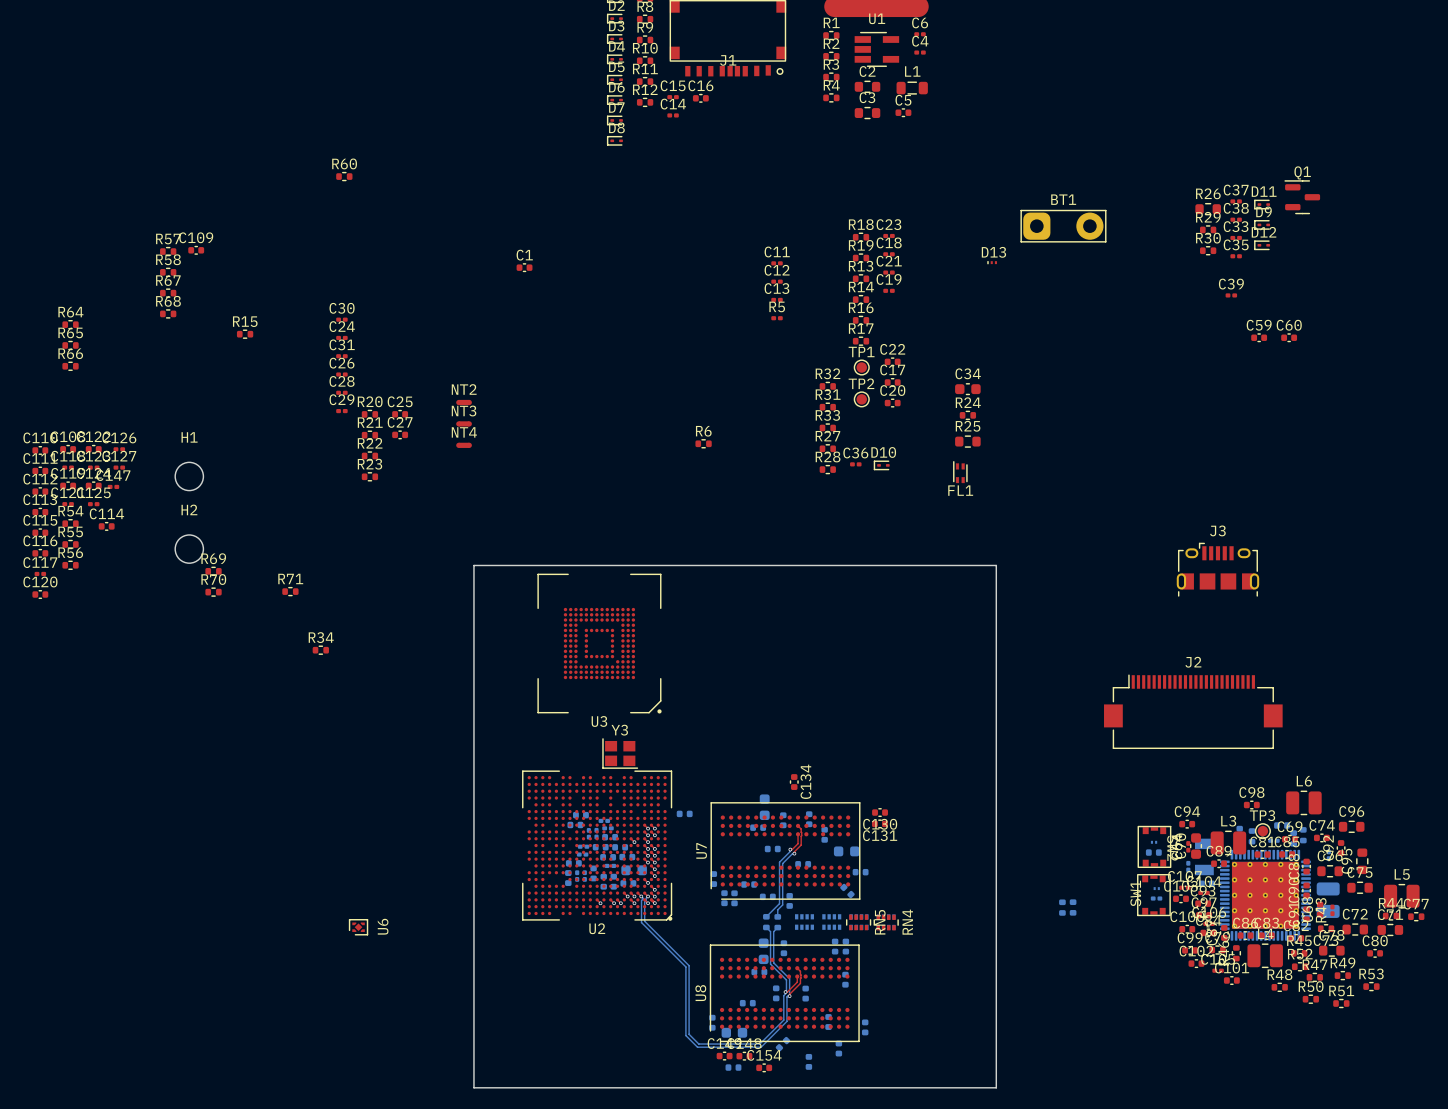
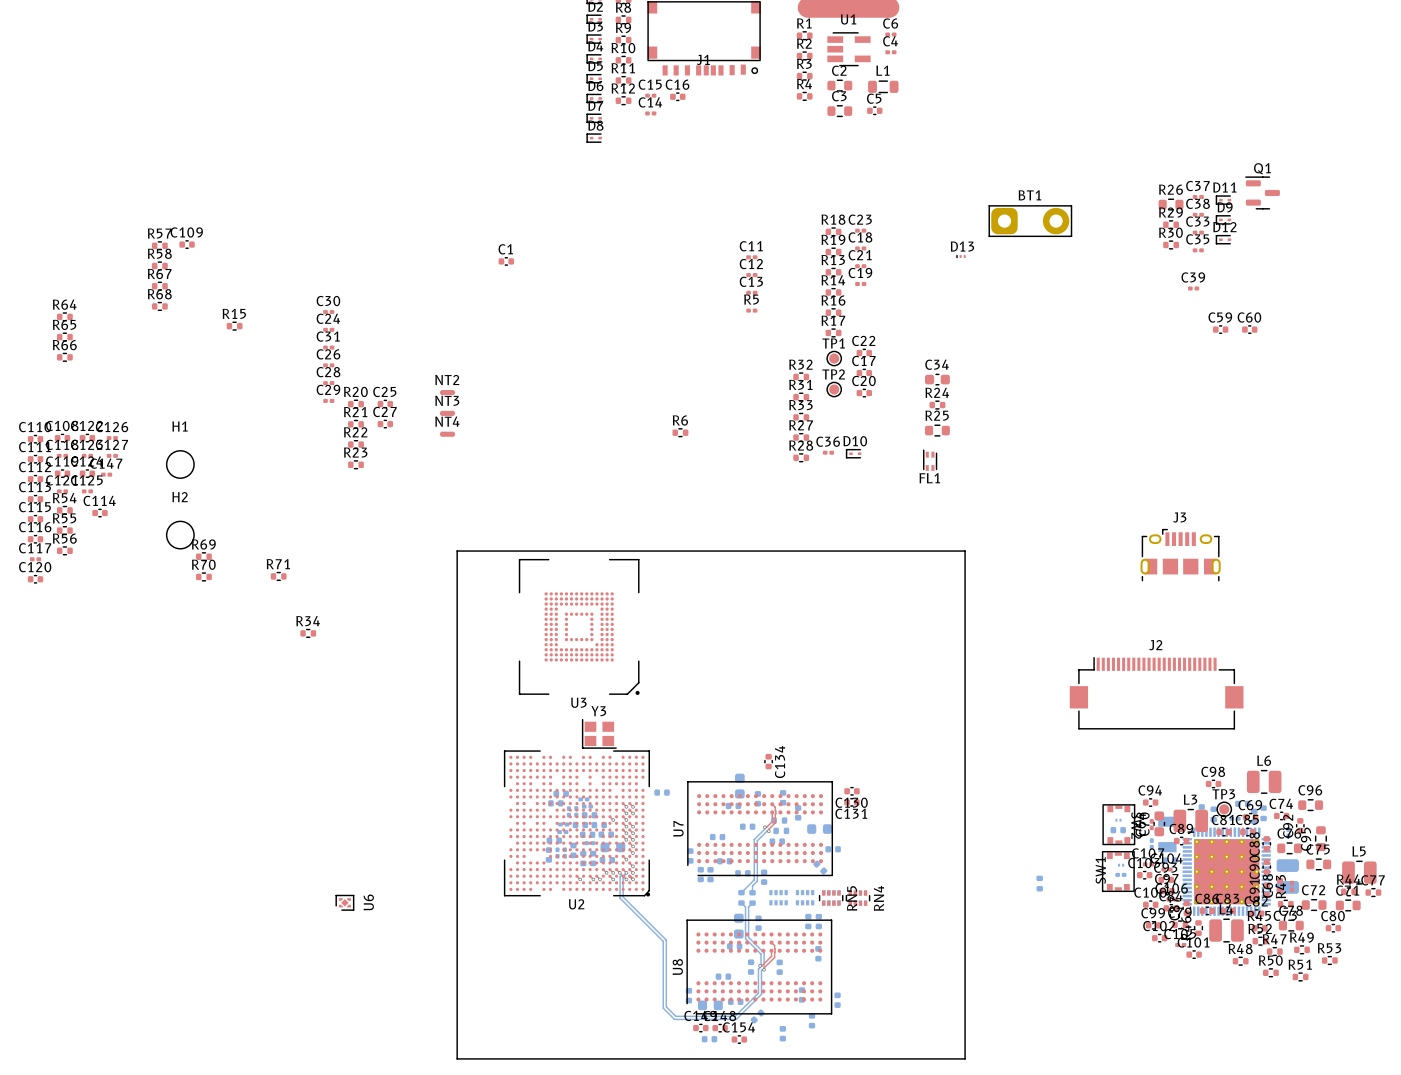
R60: (344, 176) -> none
part: none -> (779, 820)
part: none -> (781, 830)
part: none -> (717, 837)
part: (1062, 907) -> none
part: none -> (735, 1001)

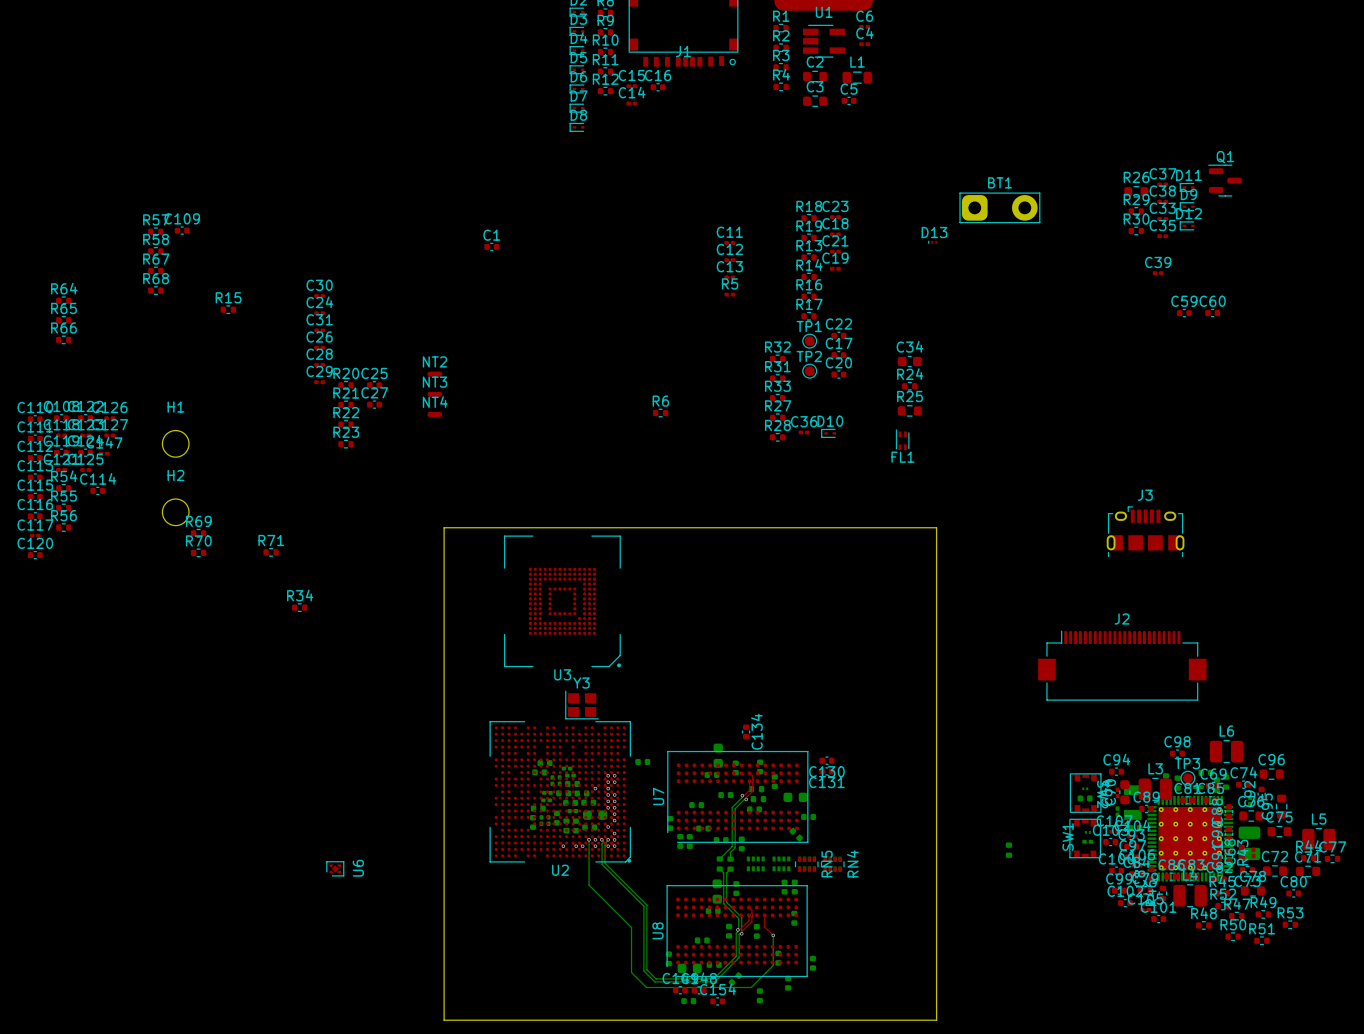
bottom track: none -> (589, 839) (589, 885) (631, 927) (631, 972) (646, 987) (751, 987) (773, 965) (773, 935)
top track: none -> (764, 915) (764, 926) (773, 935)
via: none -> (773, 935)

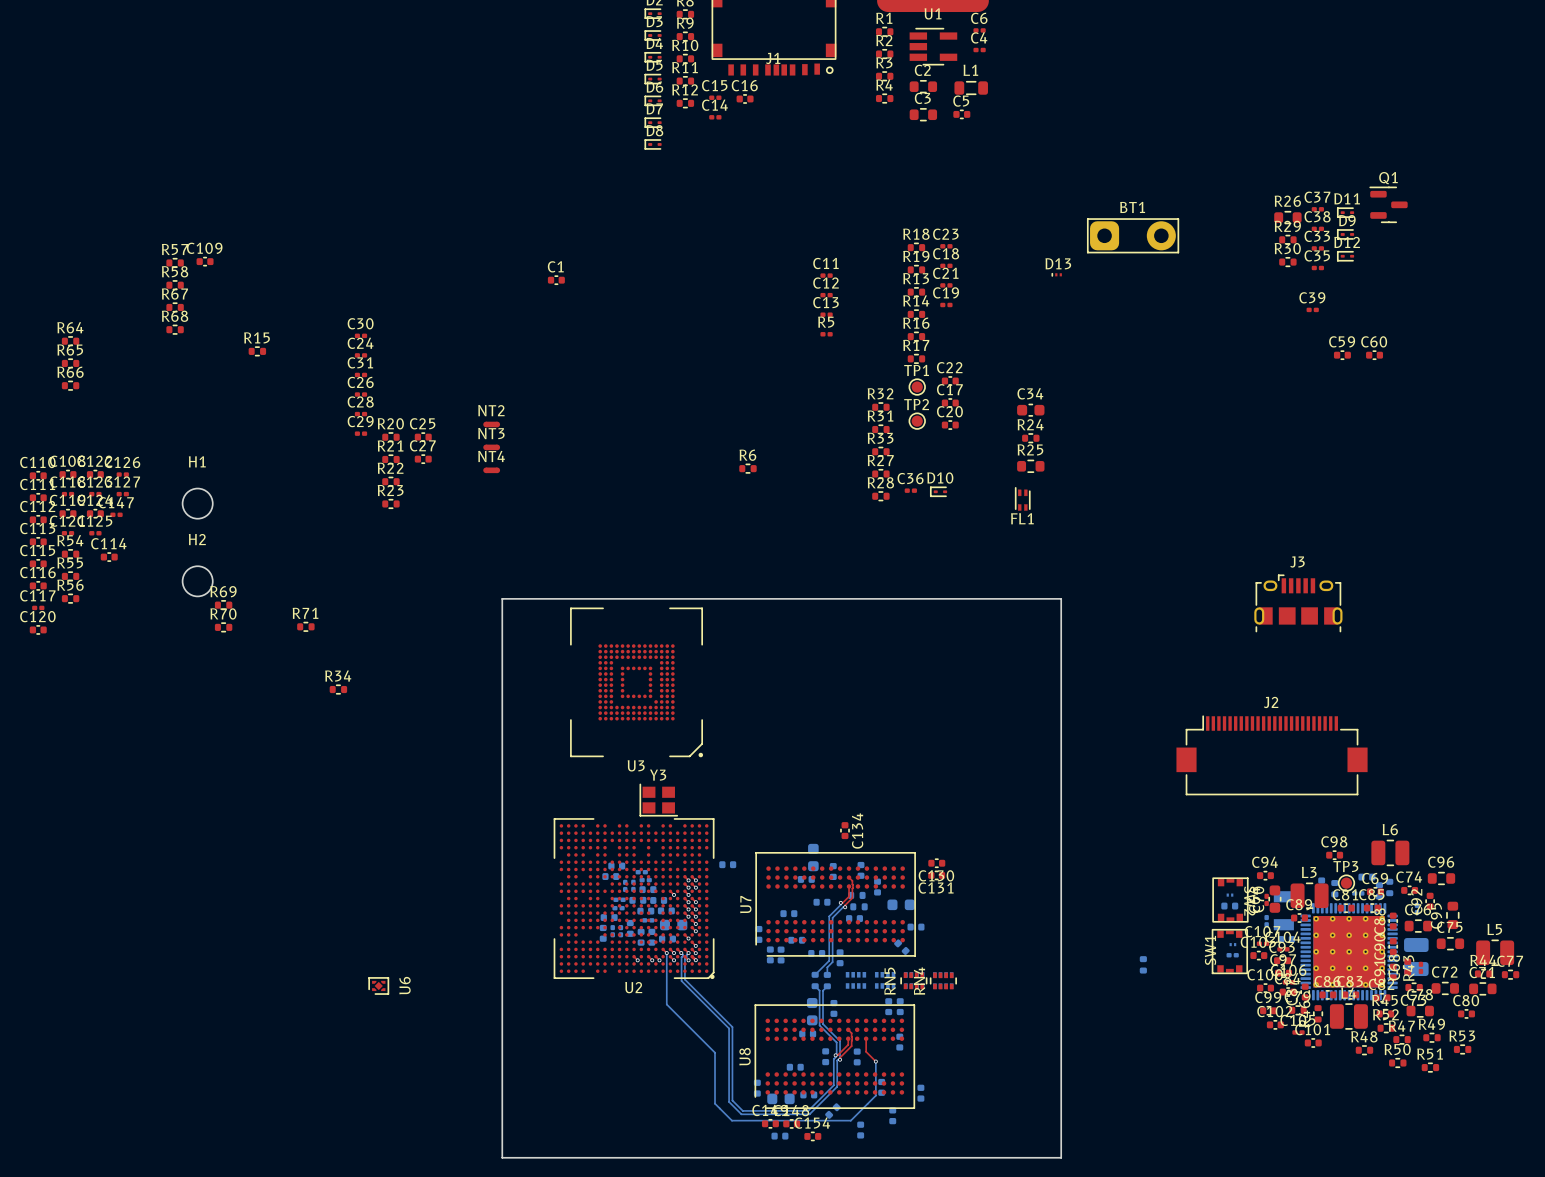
RN4 name position: RN4 (852, 863) -> RN4 (919, 981)
RN5 name position: RN5 (827, 864) -> RN5 (889, 981)

